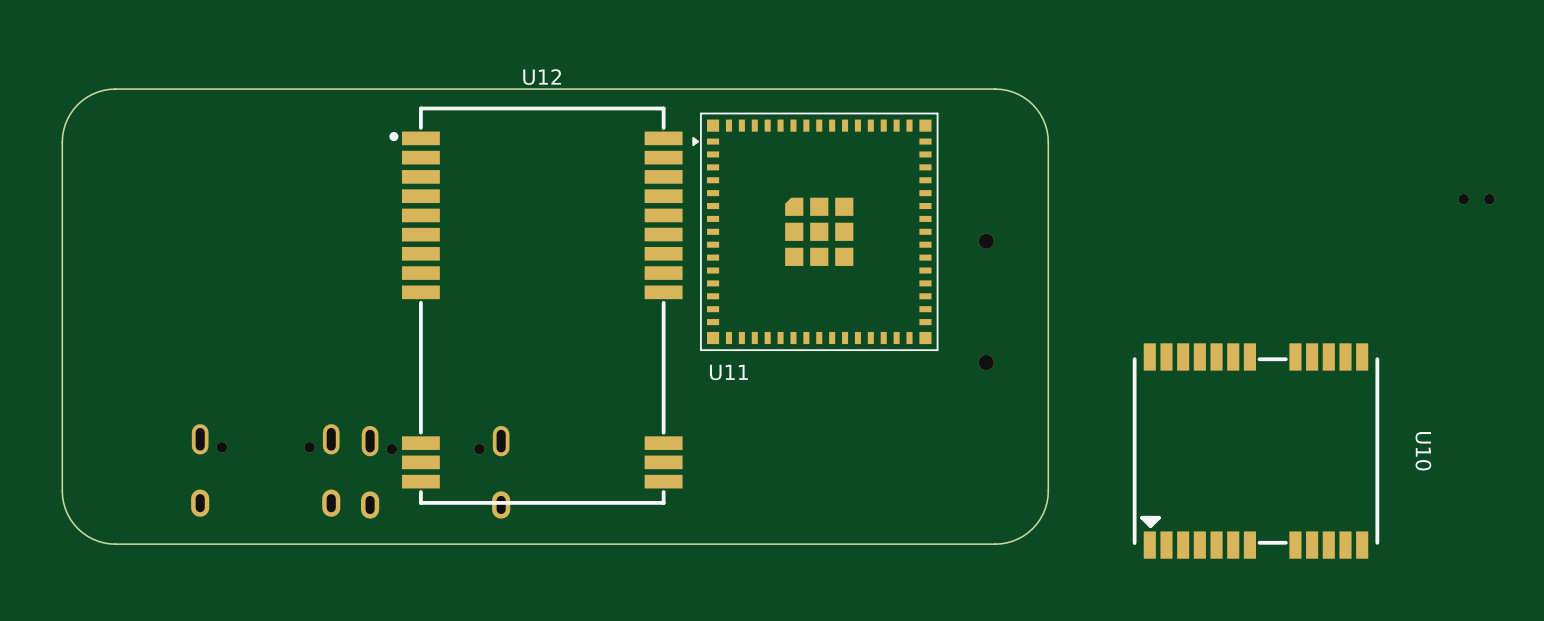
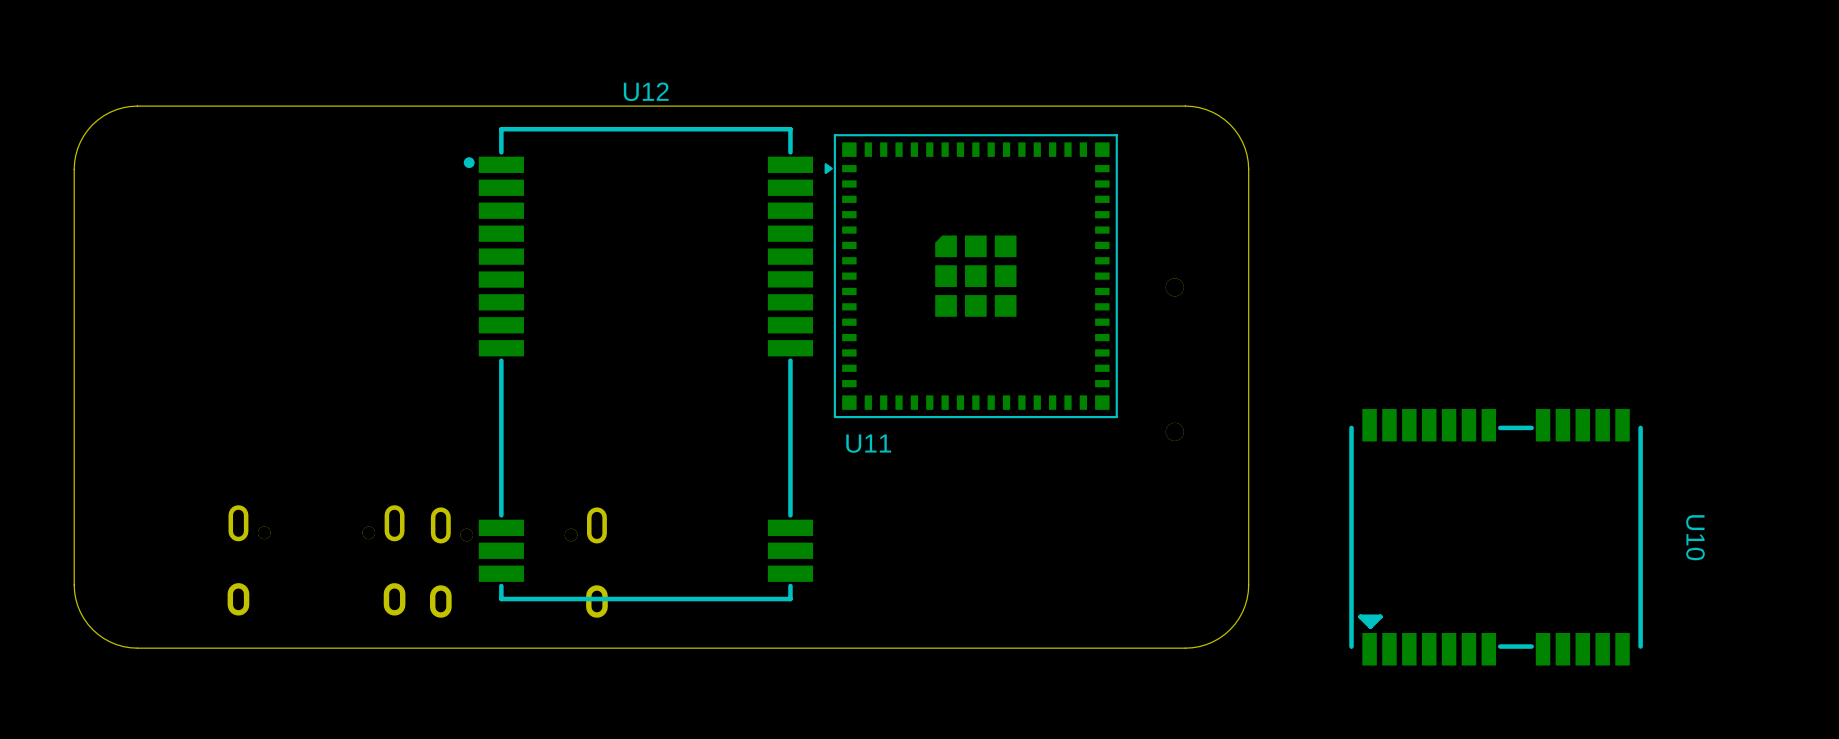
part: (1476, 199) -> none

